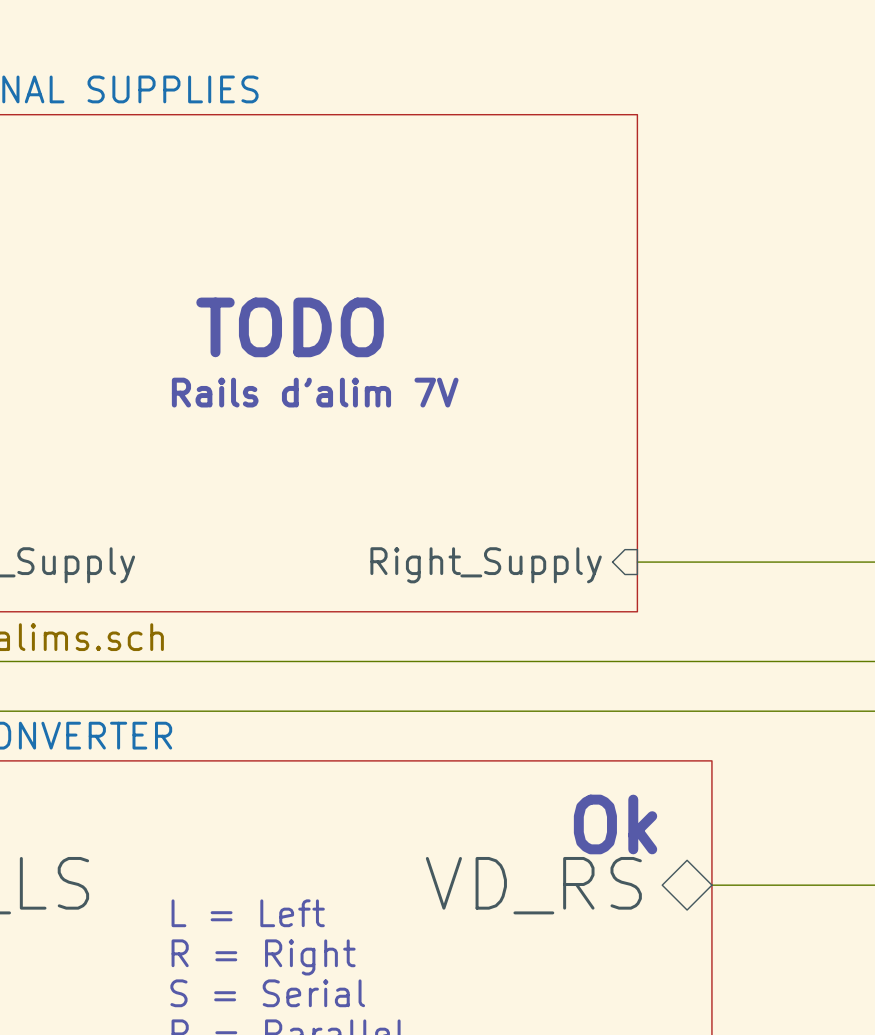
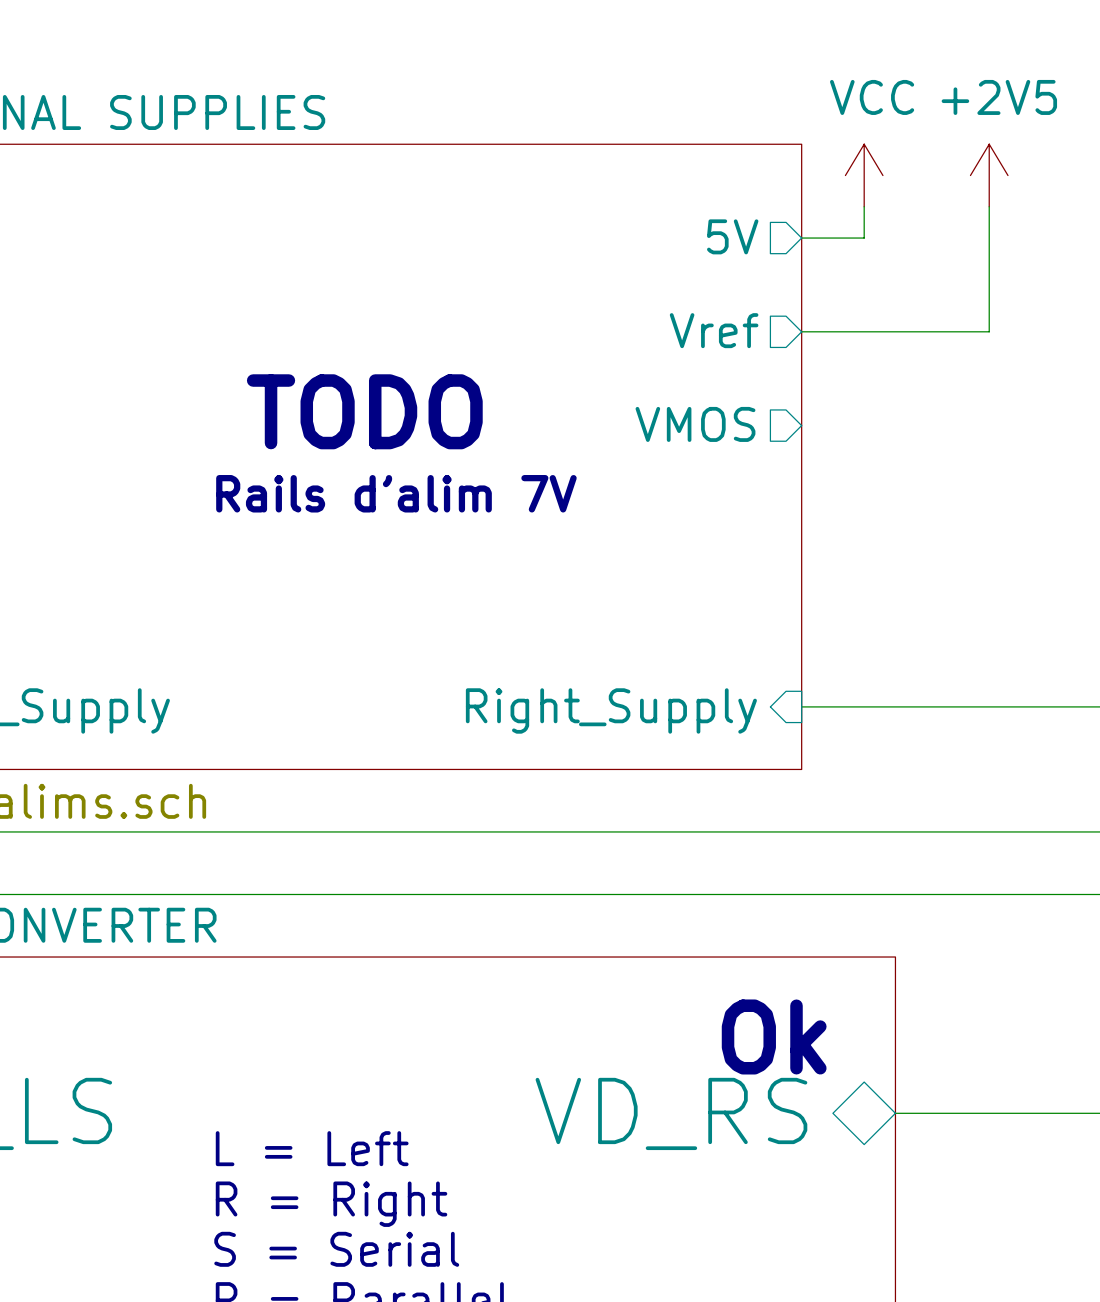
power symbol: none -> VCC (864, 175)
power symbol: none -> +2V5 (989, 175)
wire: none -> (864, 206) (864, 238) (801, 238)
wire: none -> (989, 206) (989, 331) (801, 331)
sheet pin: none -> 5V (732, 236)
sheet pin: none -> Vref (714, 330)
sheet pin: none -> VMOS (695, 424)

